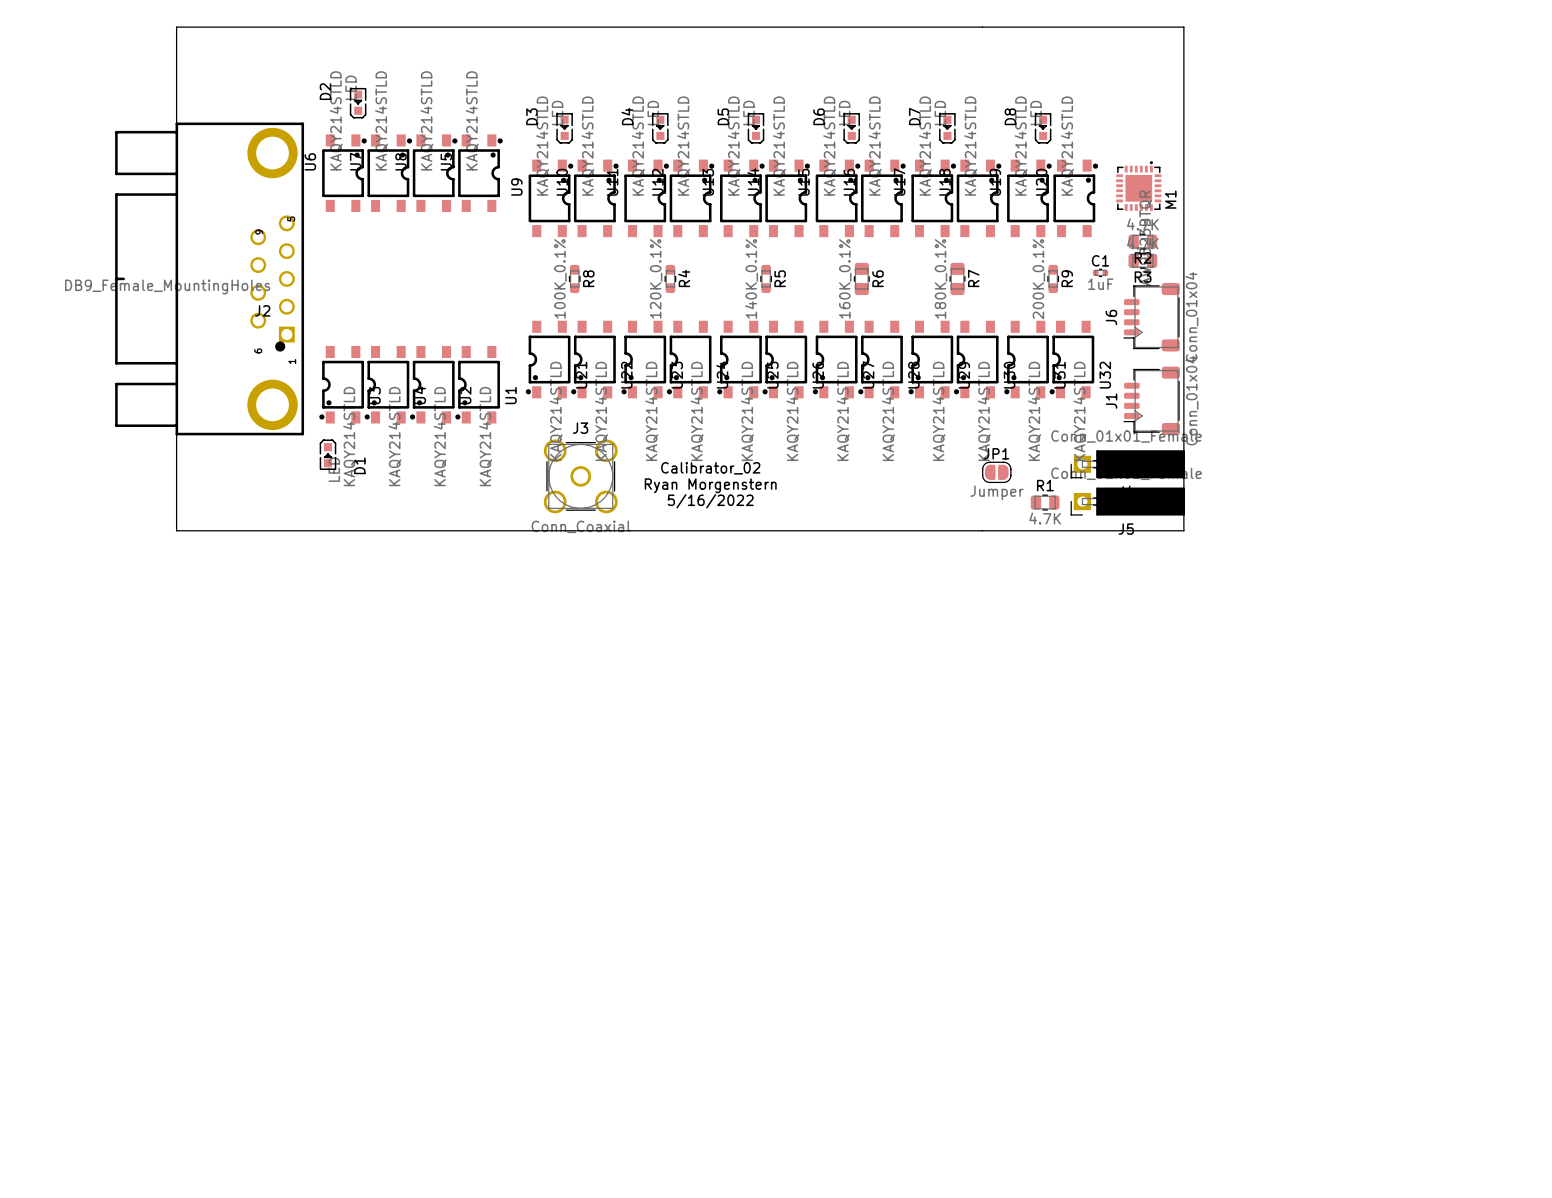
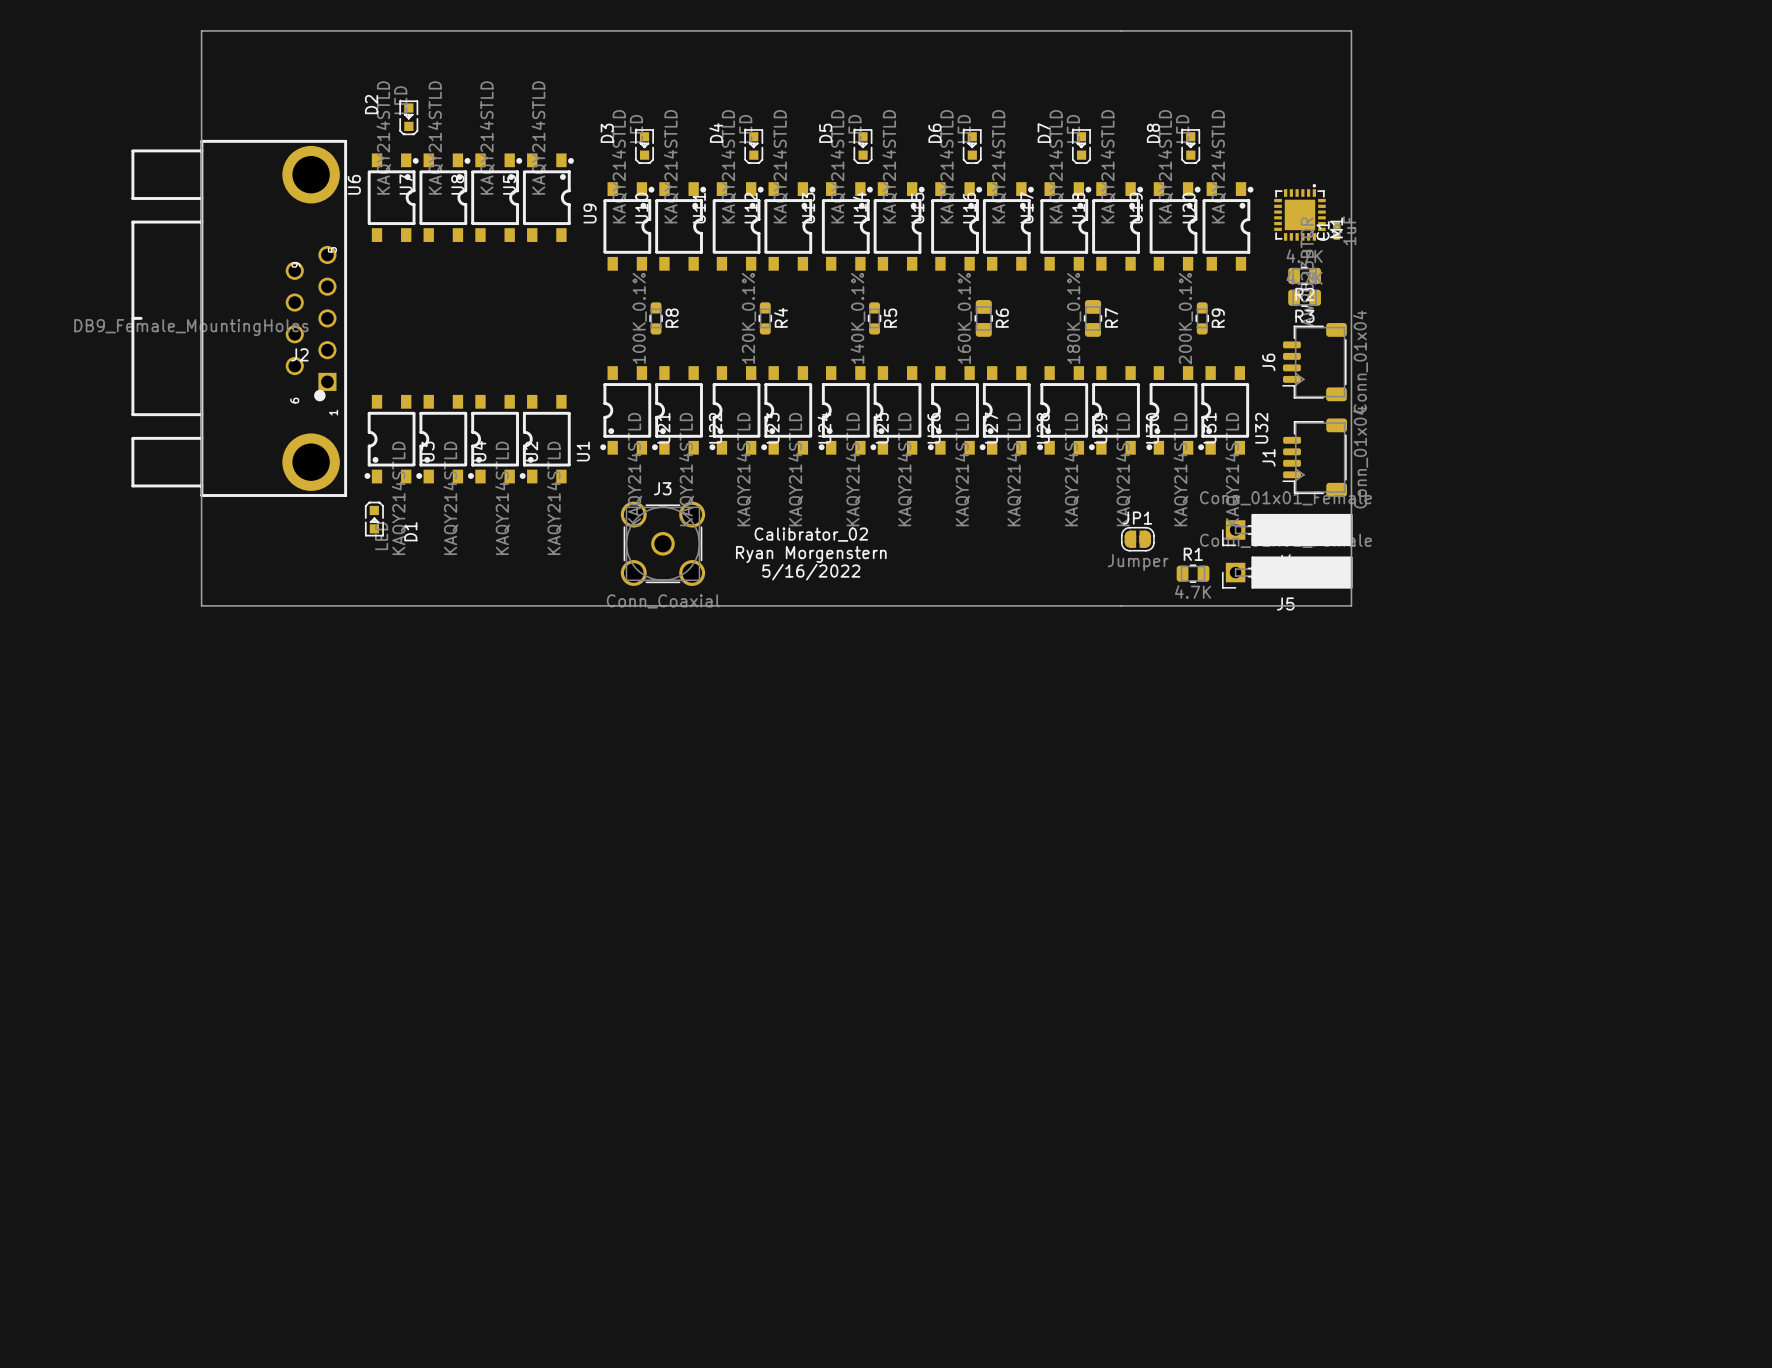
C1 rotation: 0° (1100, 272) -> 90° clockwise (1336, 231)
C1 position: (1100, 272) -> (1336, 231)

